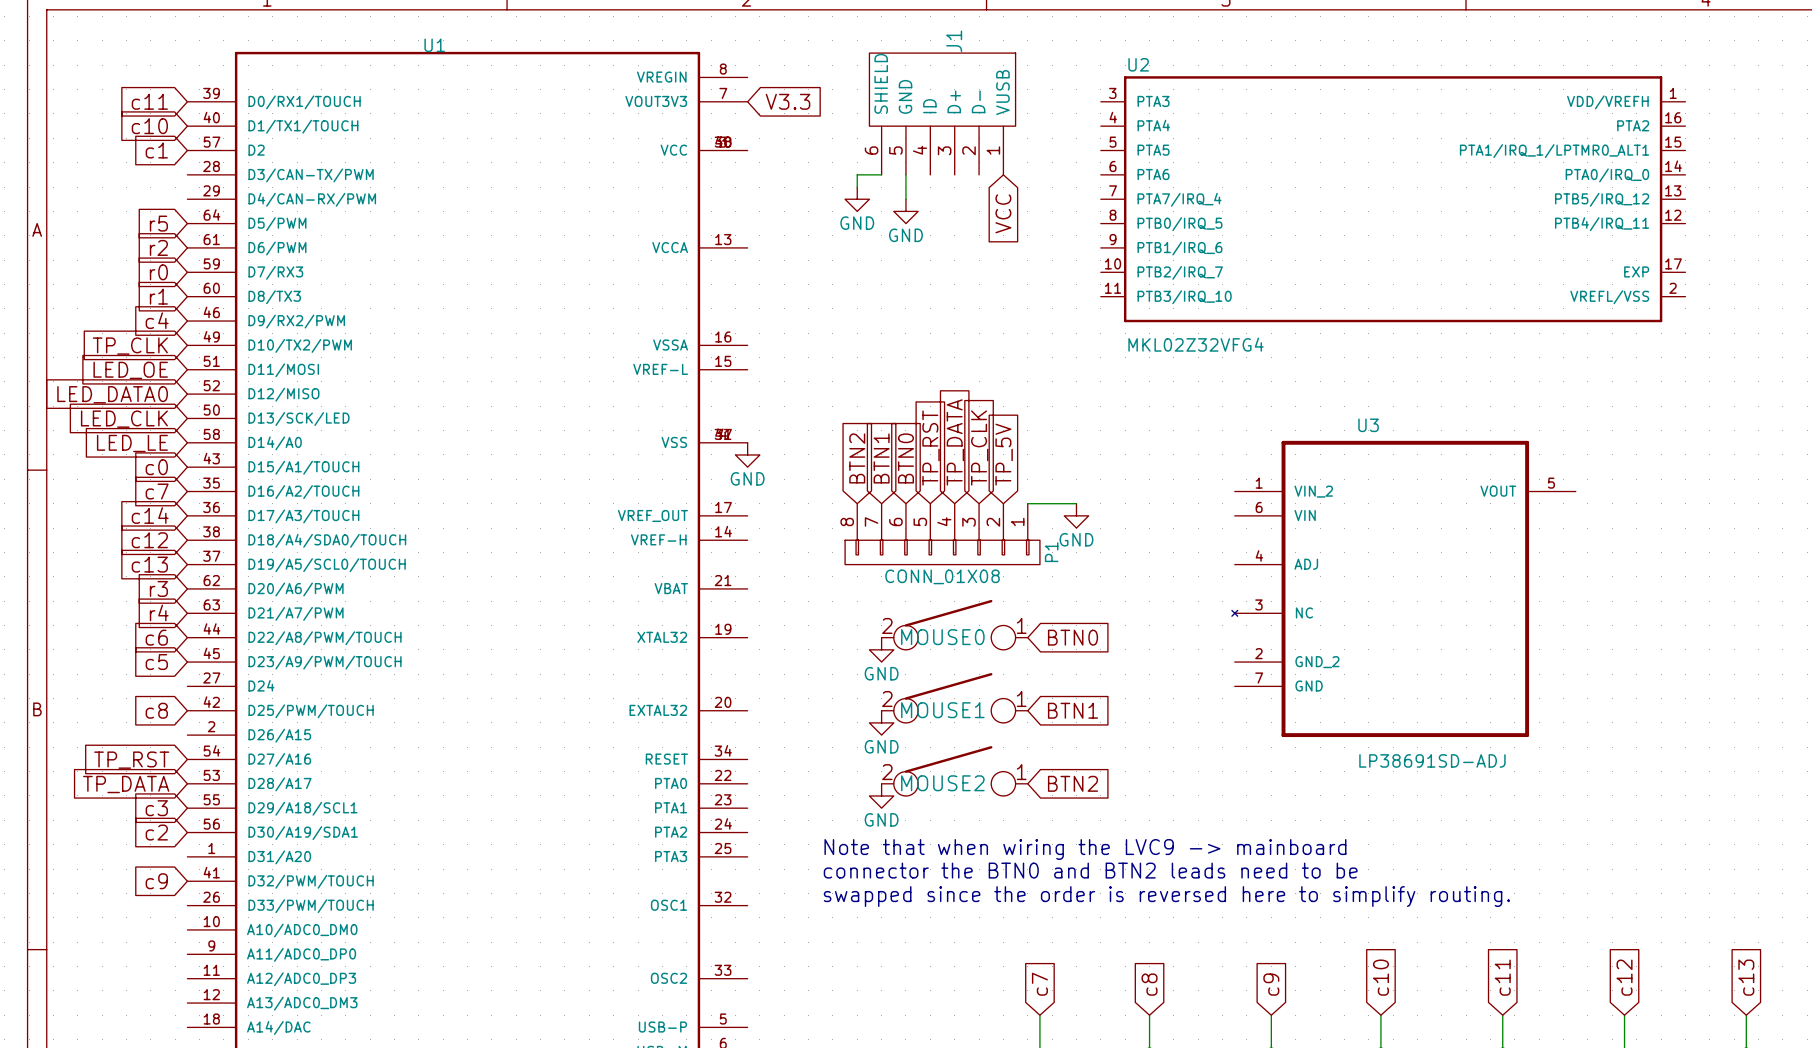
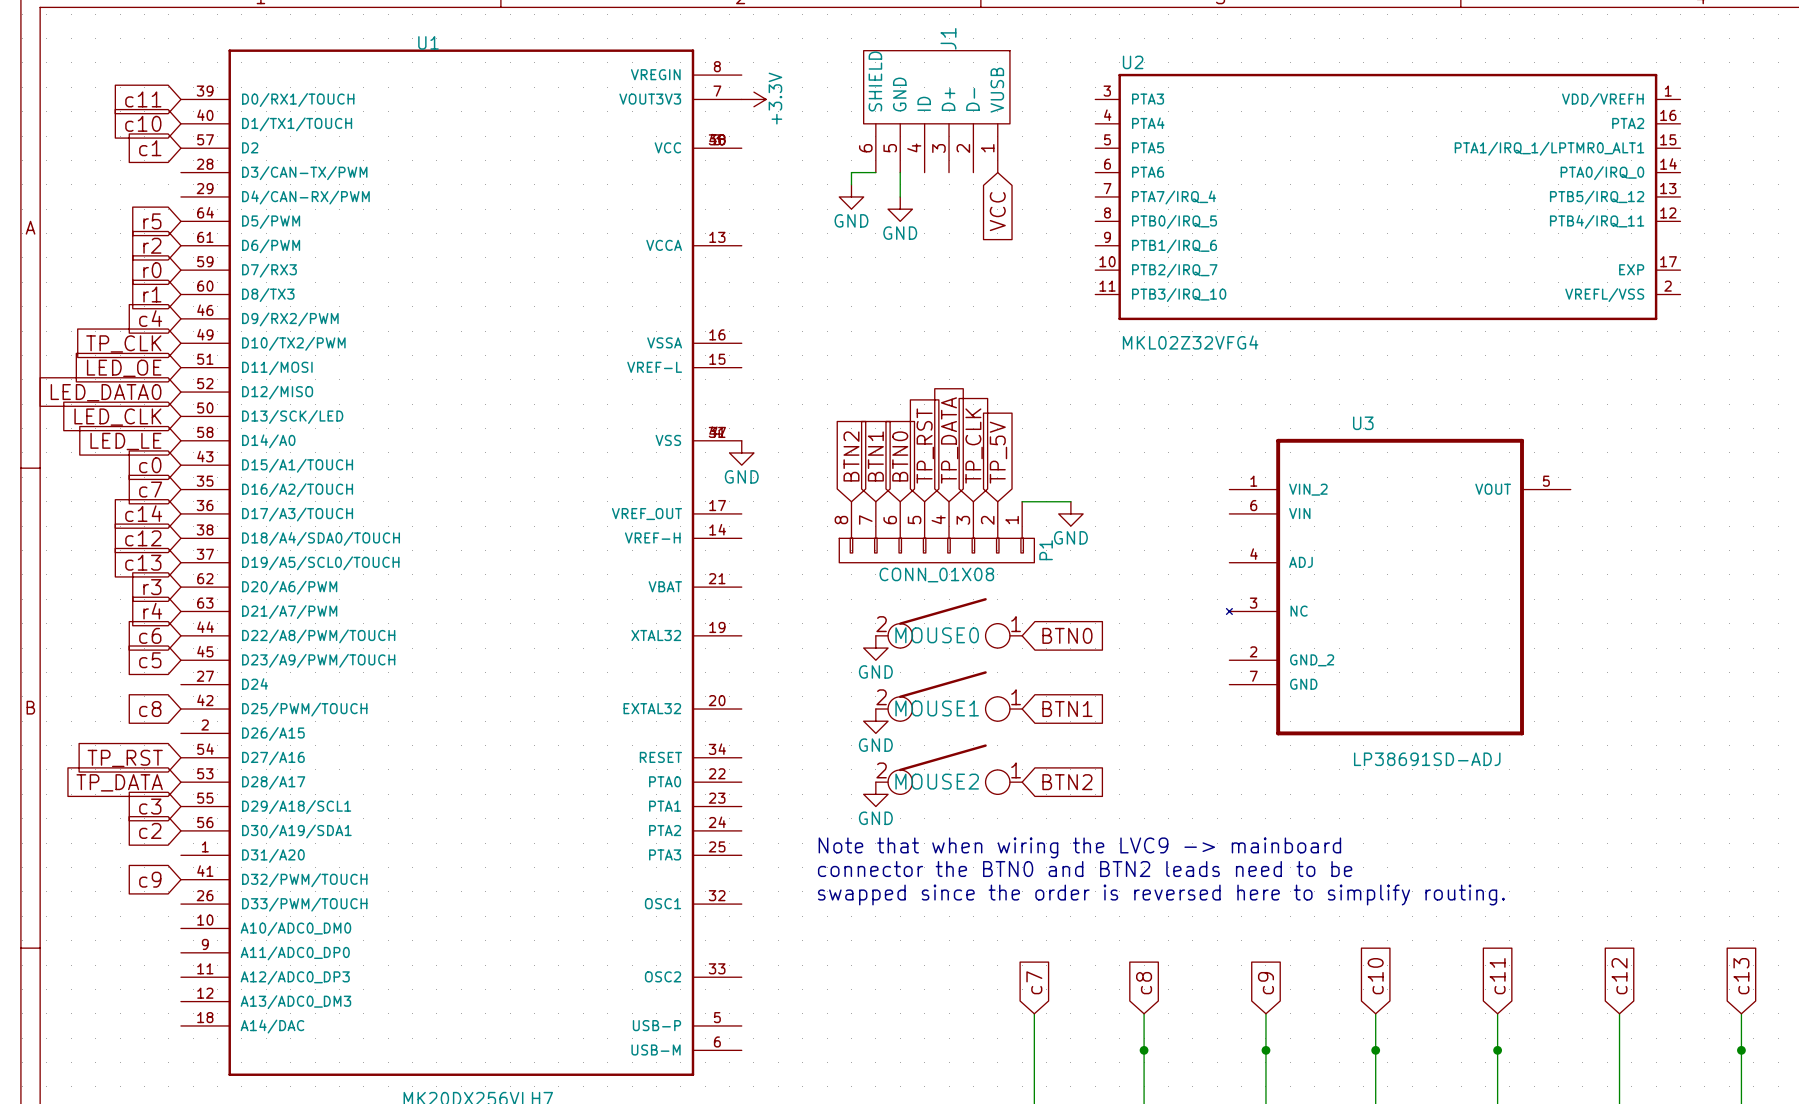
power symbol: none -> +3.3V (753, 99)
global label: V3.3 (788, 101) -> none

